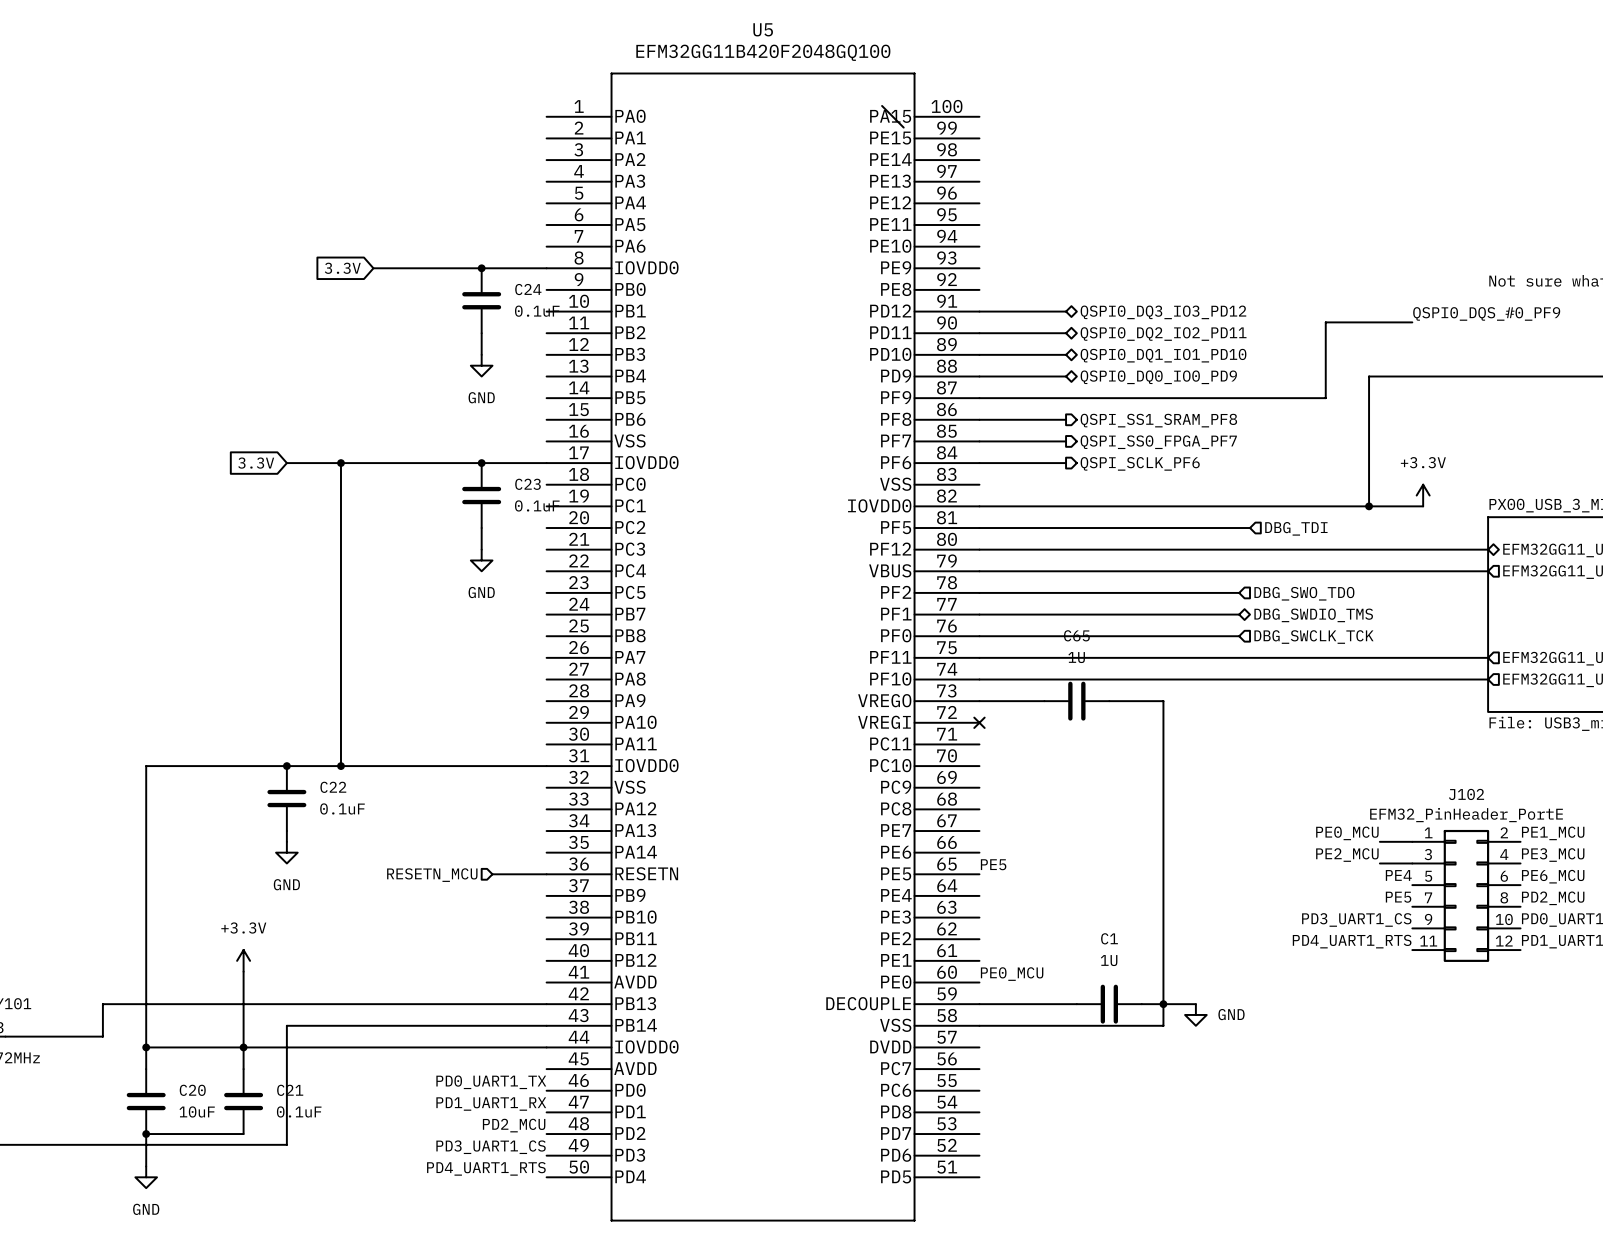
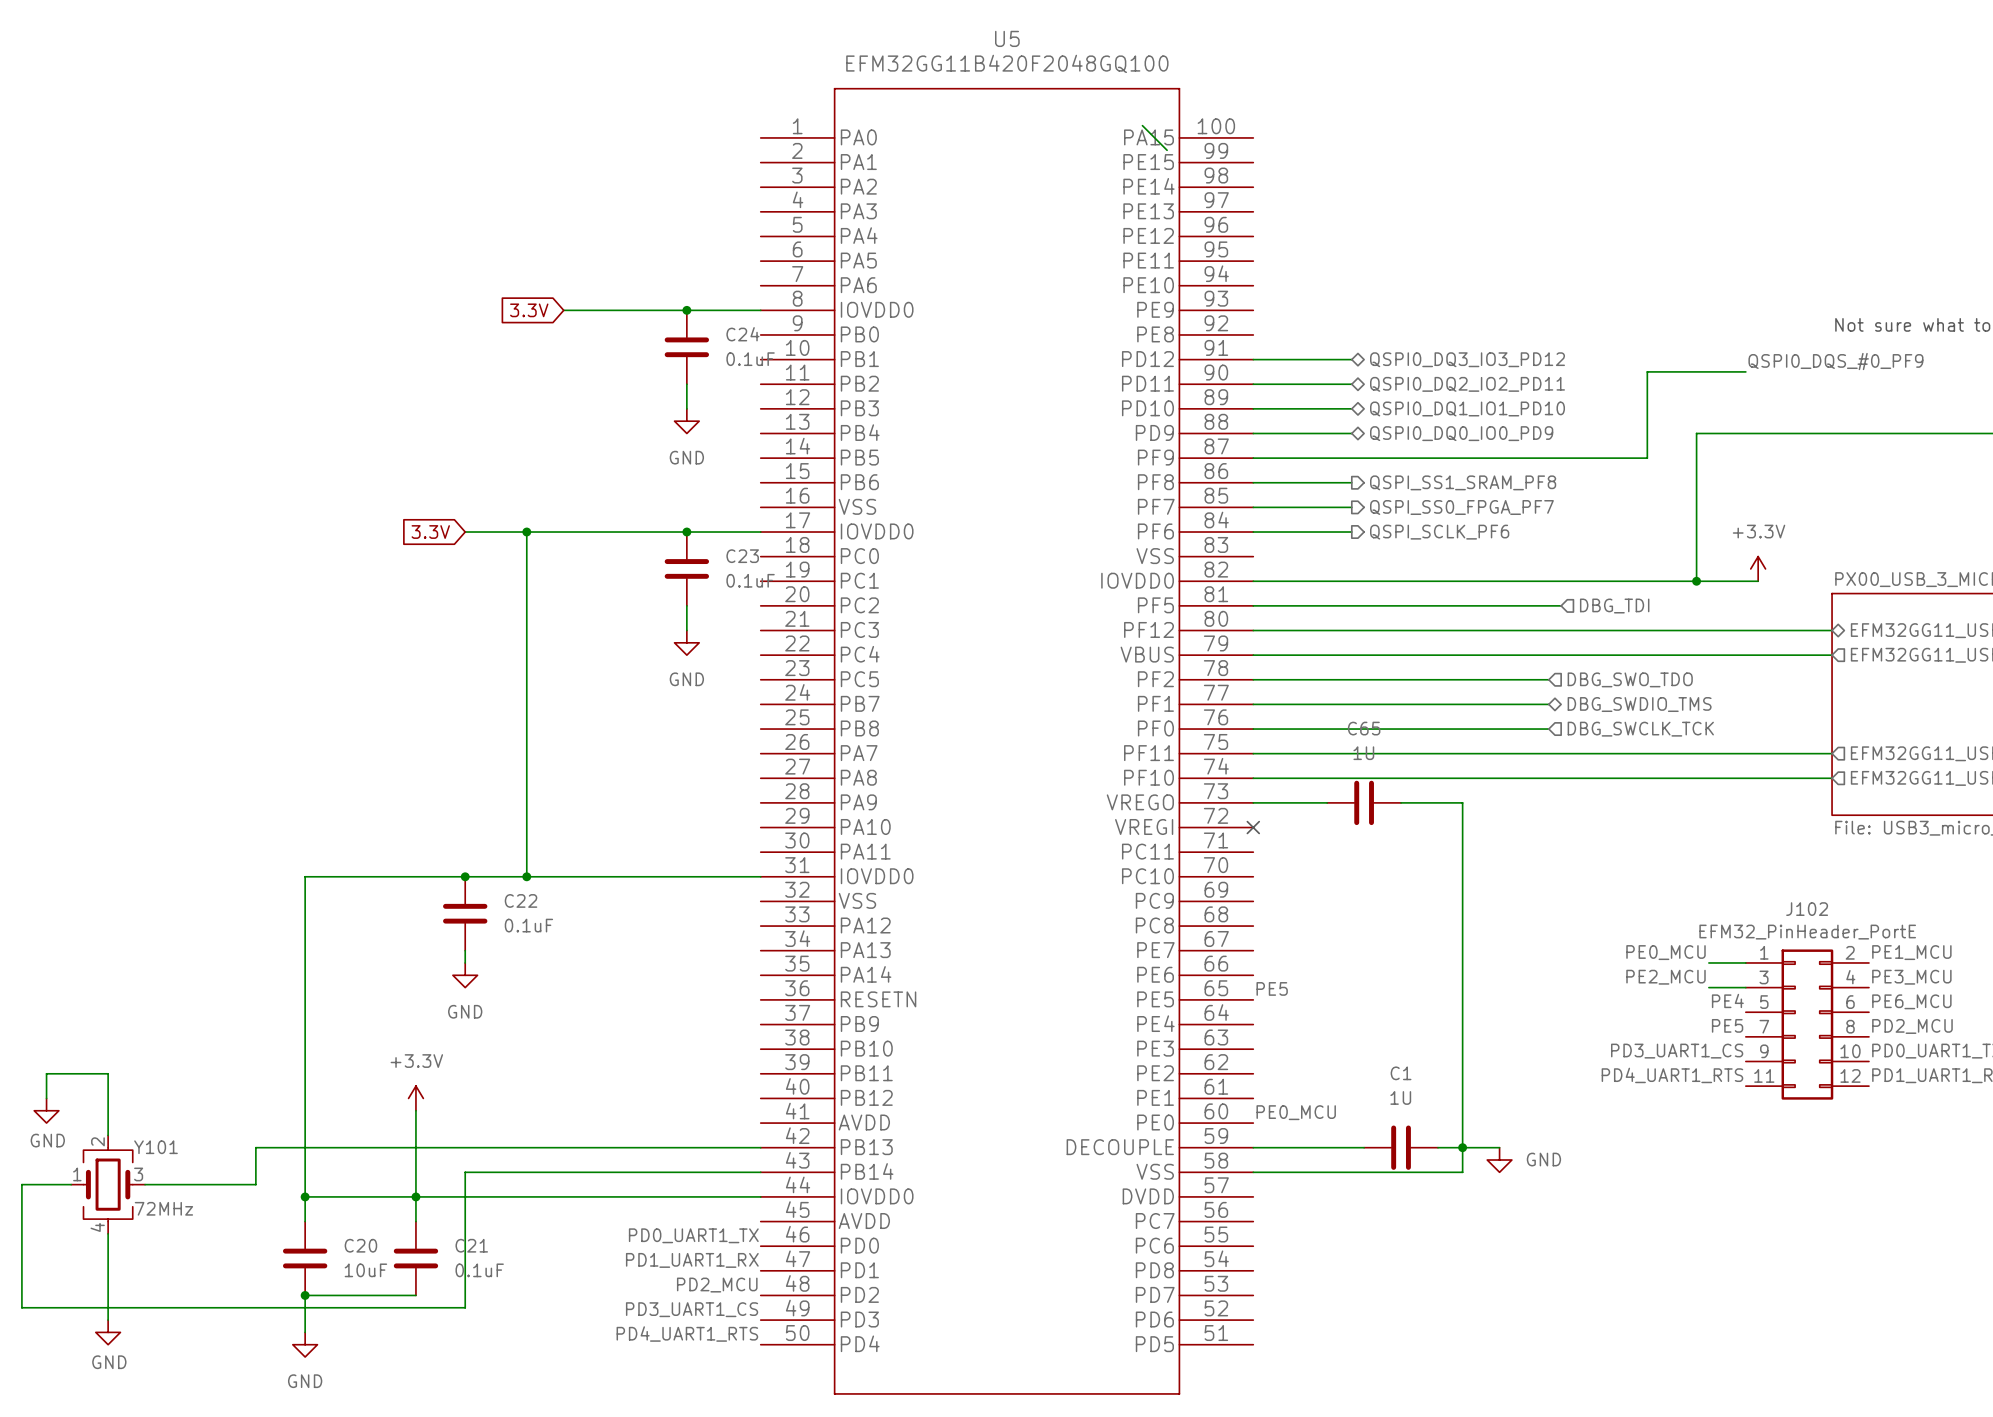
wire: (492, 874) (546, 874) -> none
hierarchical label: RESETN_MCU (432, 875) -> none

